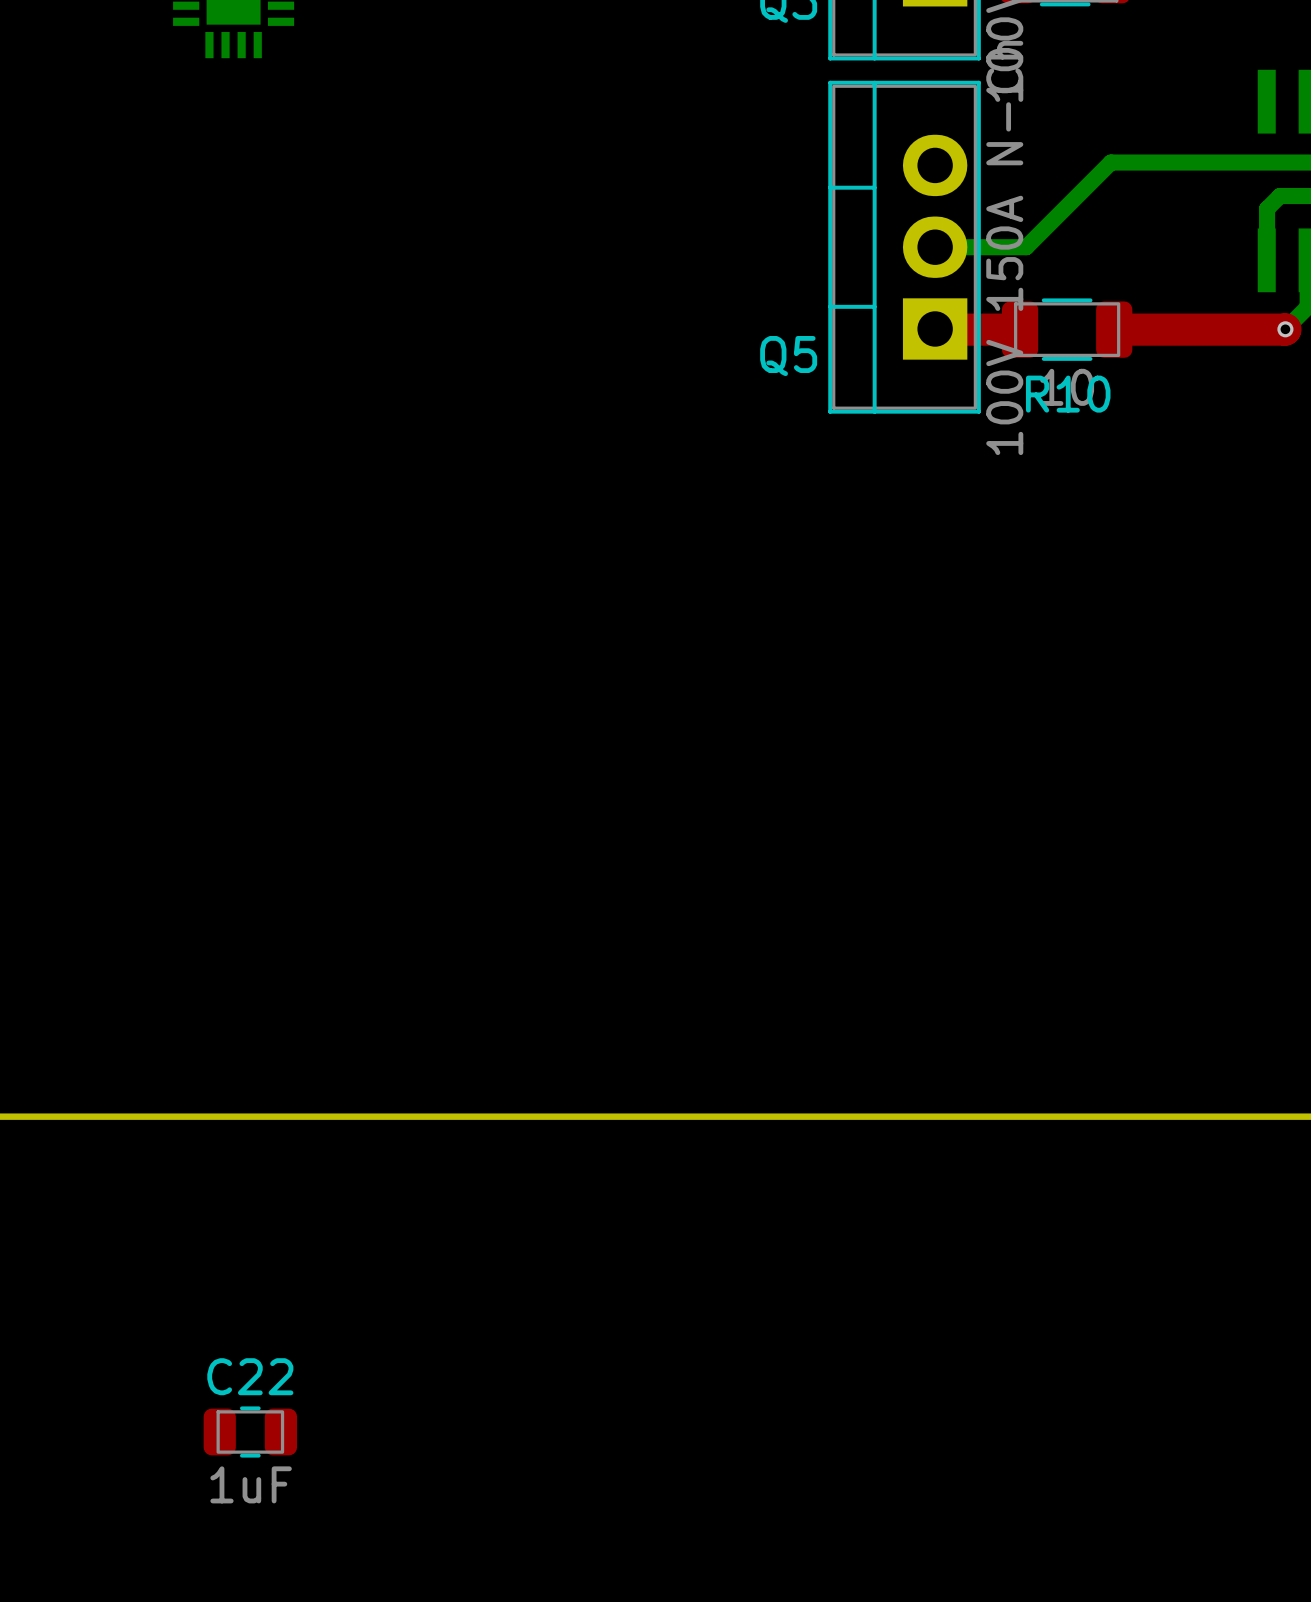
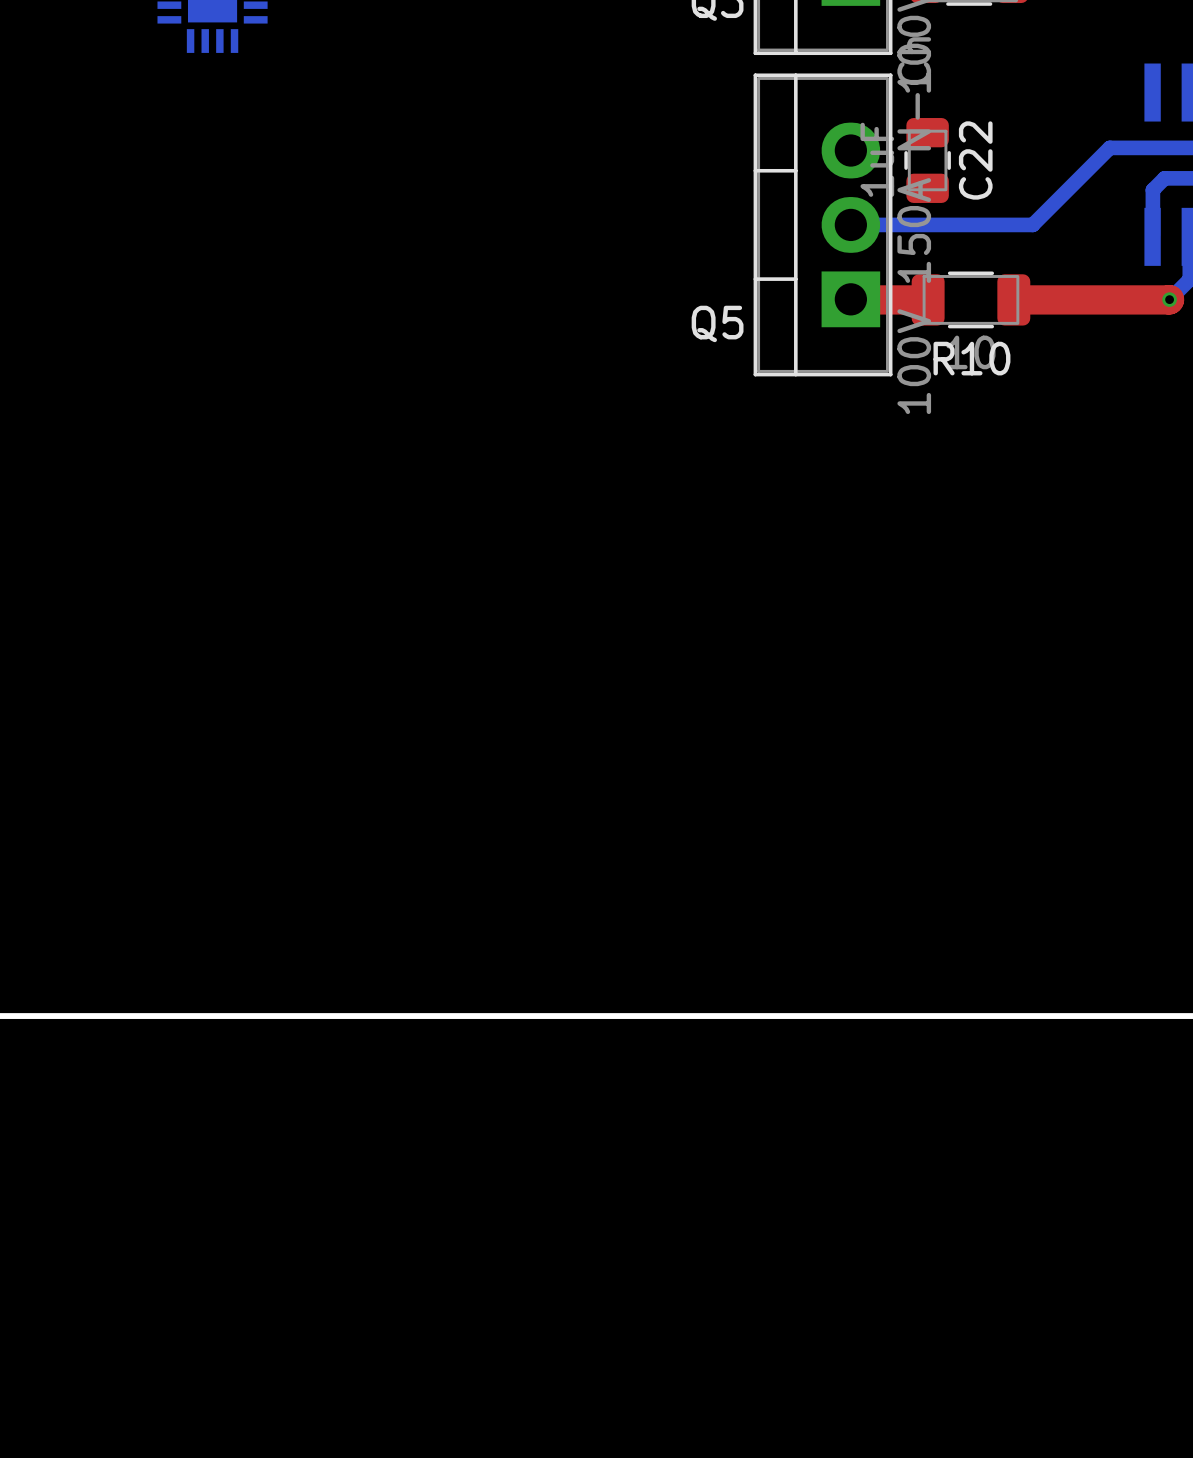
bottom track: (1219, 162) (1110, 162) (1026, 247) -> (1109, 147) (1032, 224) (933, 224)
C22 rotation: 0° (250, 1432) -> 90° clockwise (927, 160)
C22 position: (250, 1432) -> (927, 160)

